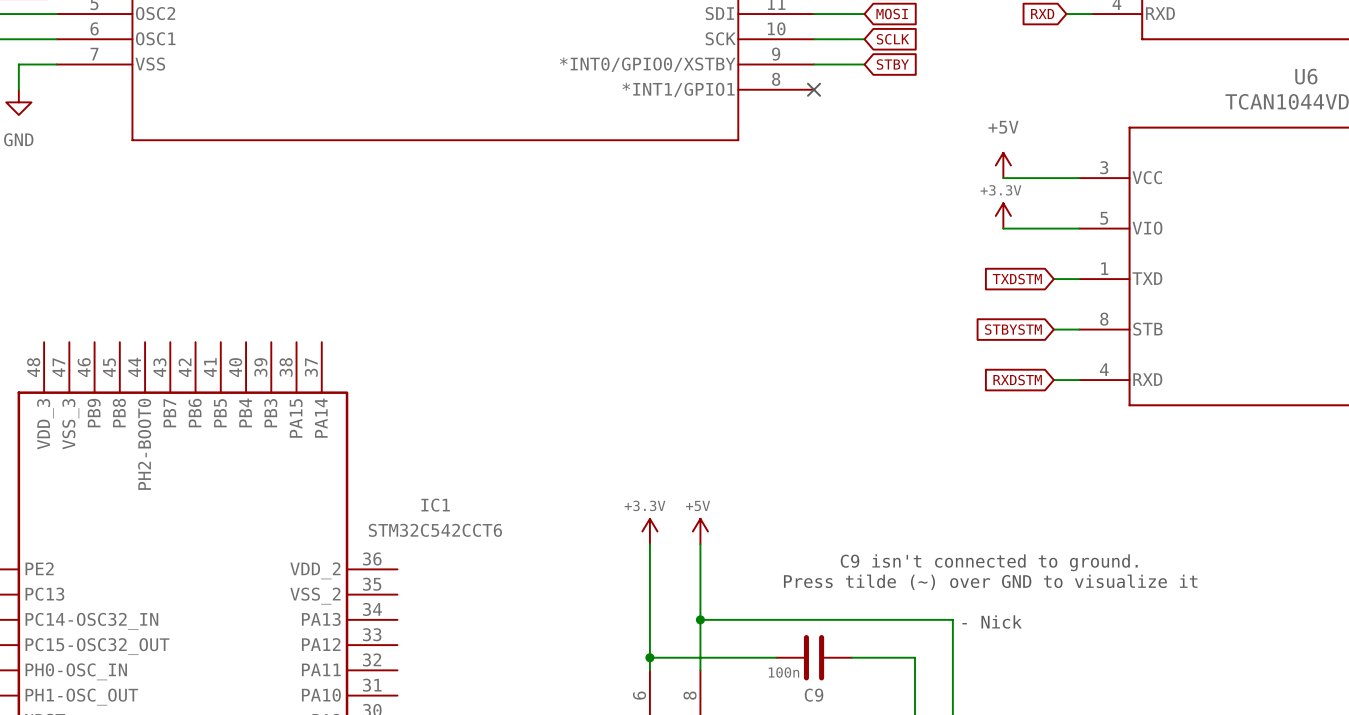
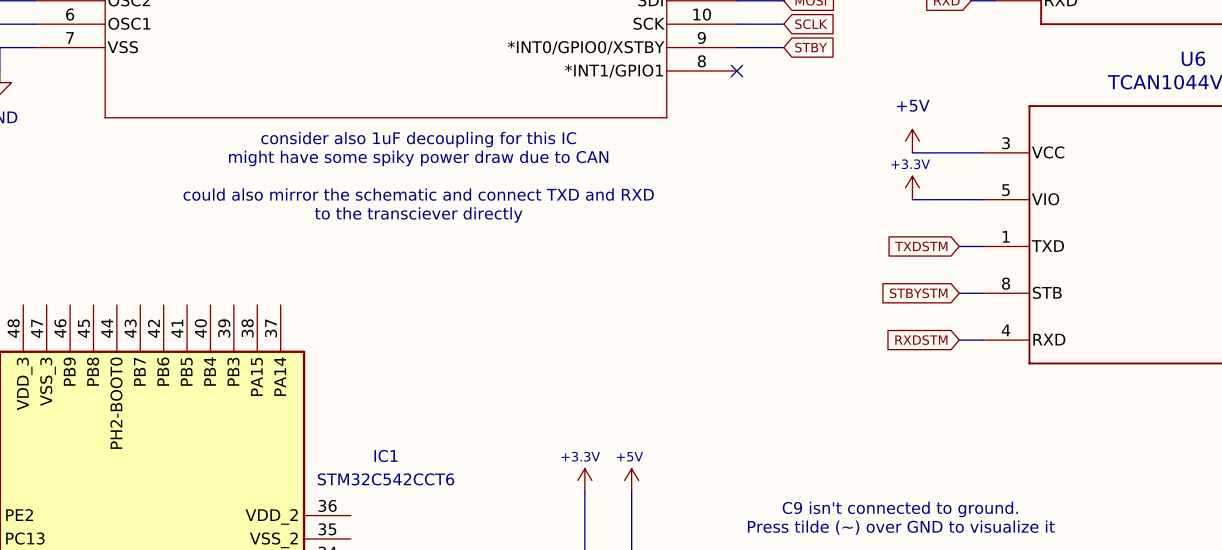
text: none -> consider also 1uF decoupling for this IC (418, 139)
text: none -> might have some spiky power draw due to CAN (418, 158)
text: none -> could also mirror the schematic and connect TXD and RXD (418, 194)
text: none -> to the transciever directly (418, 214)

